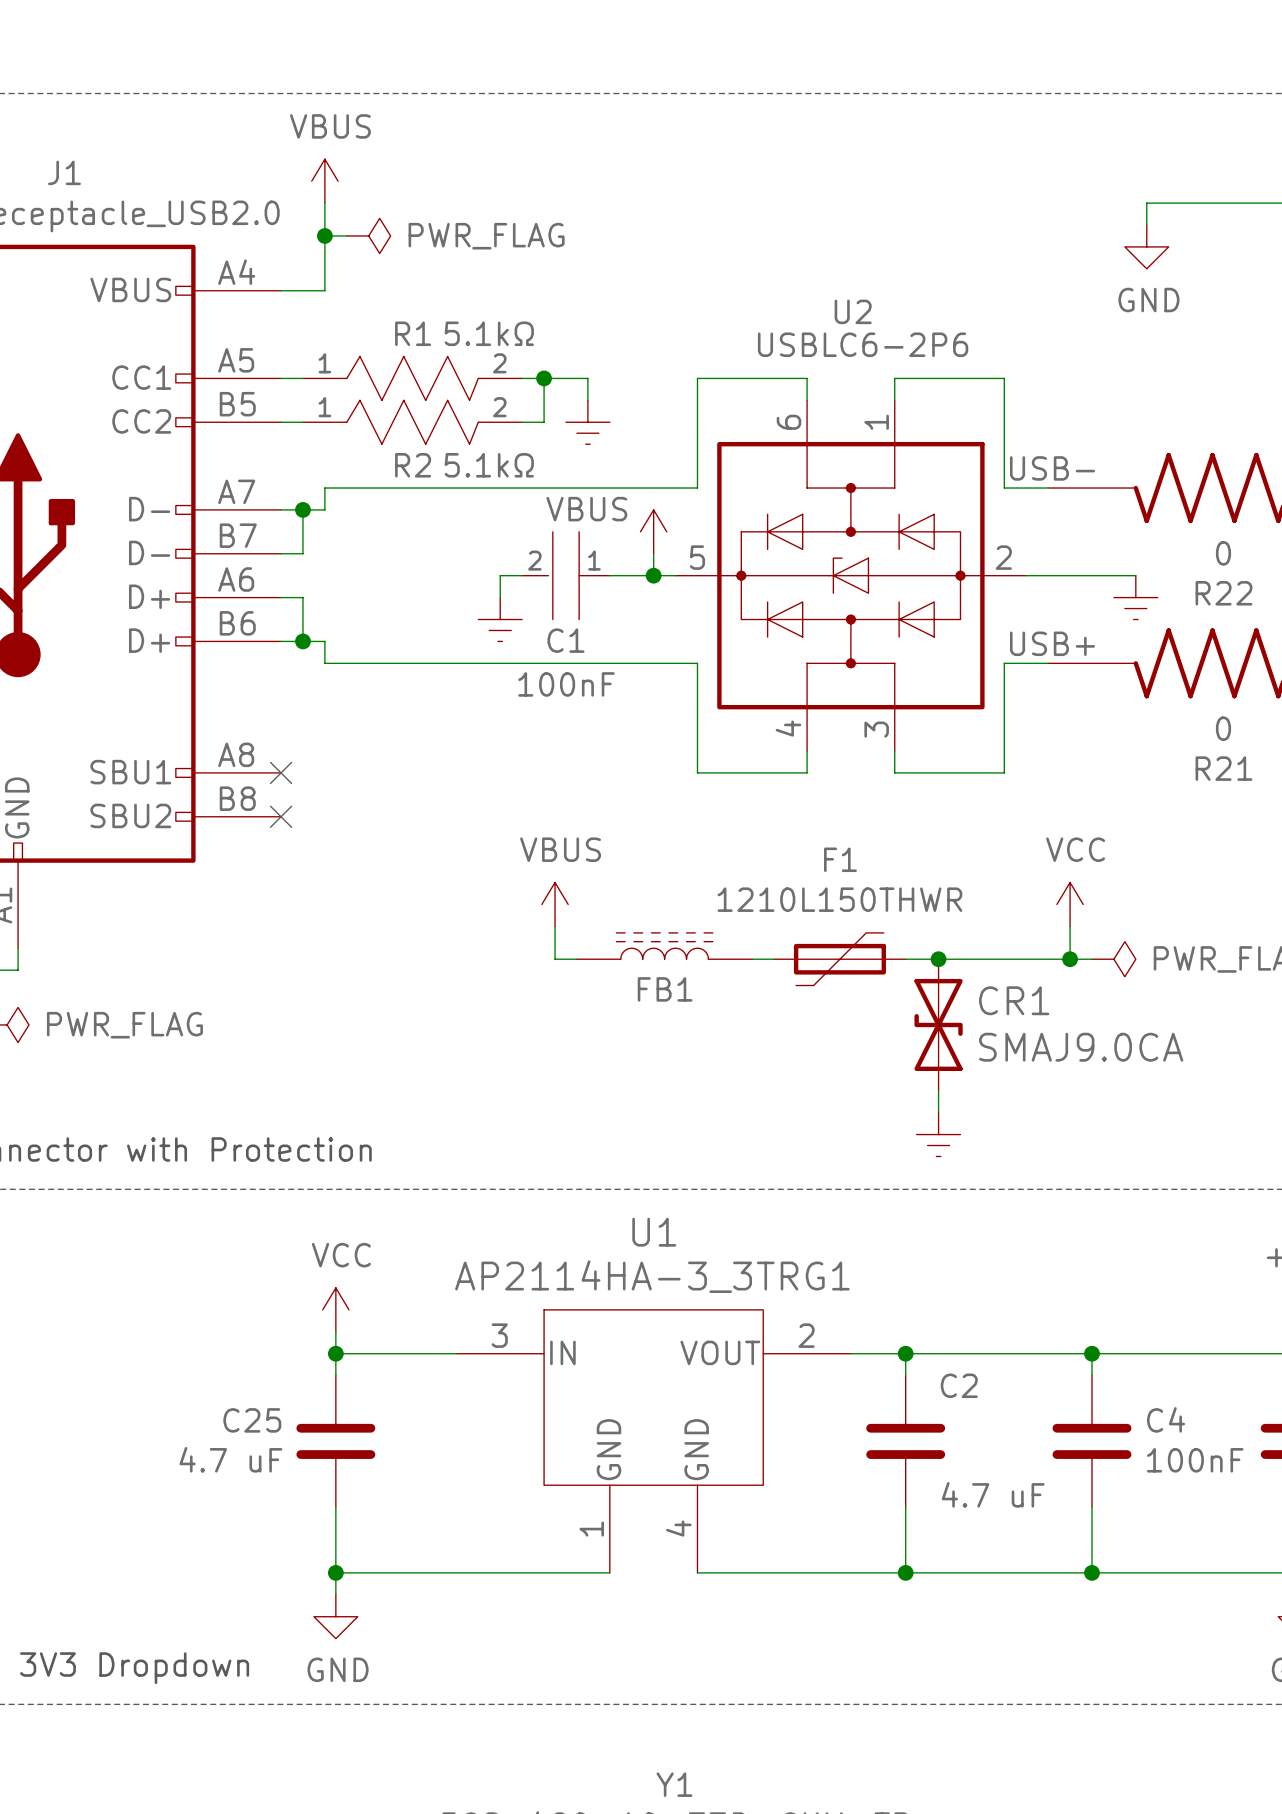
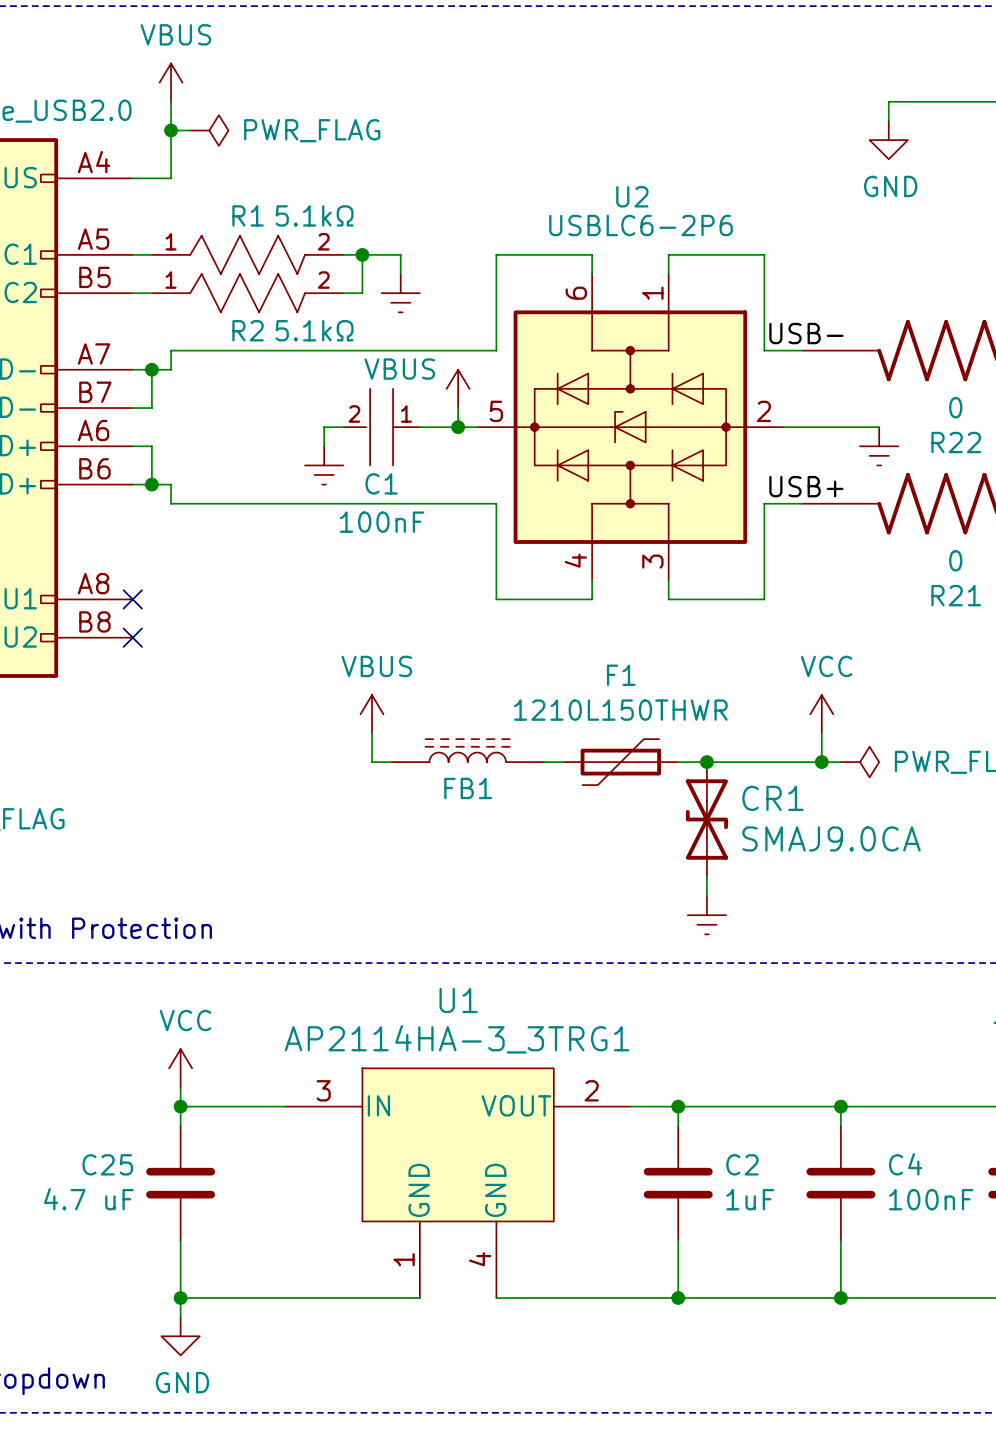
C2 name position: C2 (959, 1385) -> C2 (742, 1164)
C2 value: 4.7 uF (993, 1494) -> 1uF (750, 1199)

